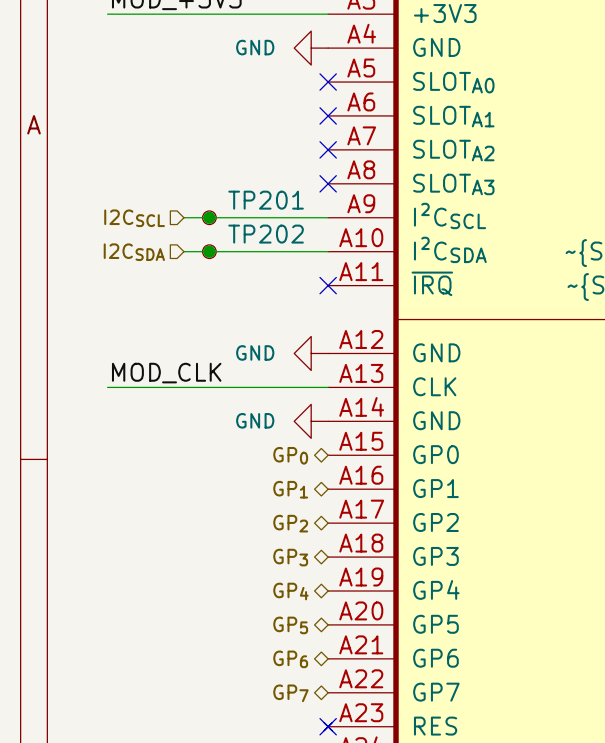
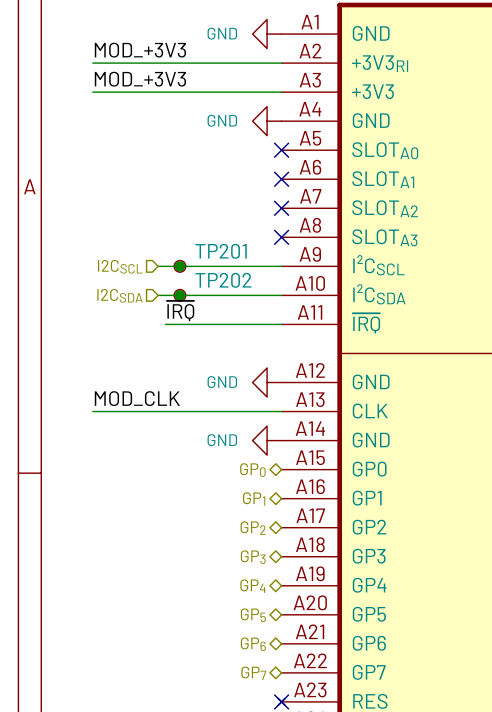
label: none -> ~{IRQ} (180, 311)
wire: none -> (165, 324) (281, 324)
no-connect mark: (328, 285) -> none

